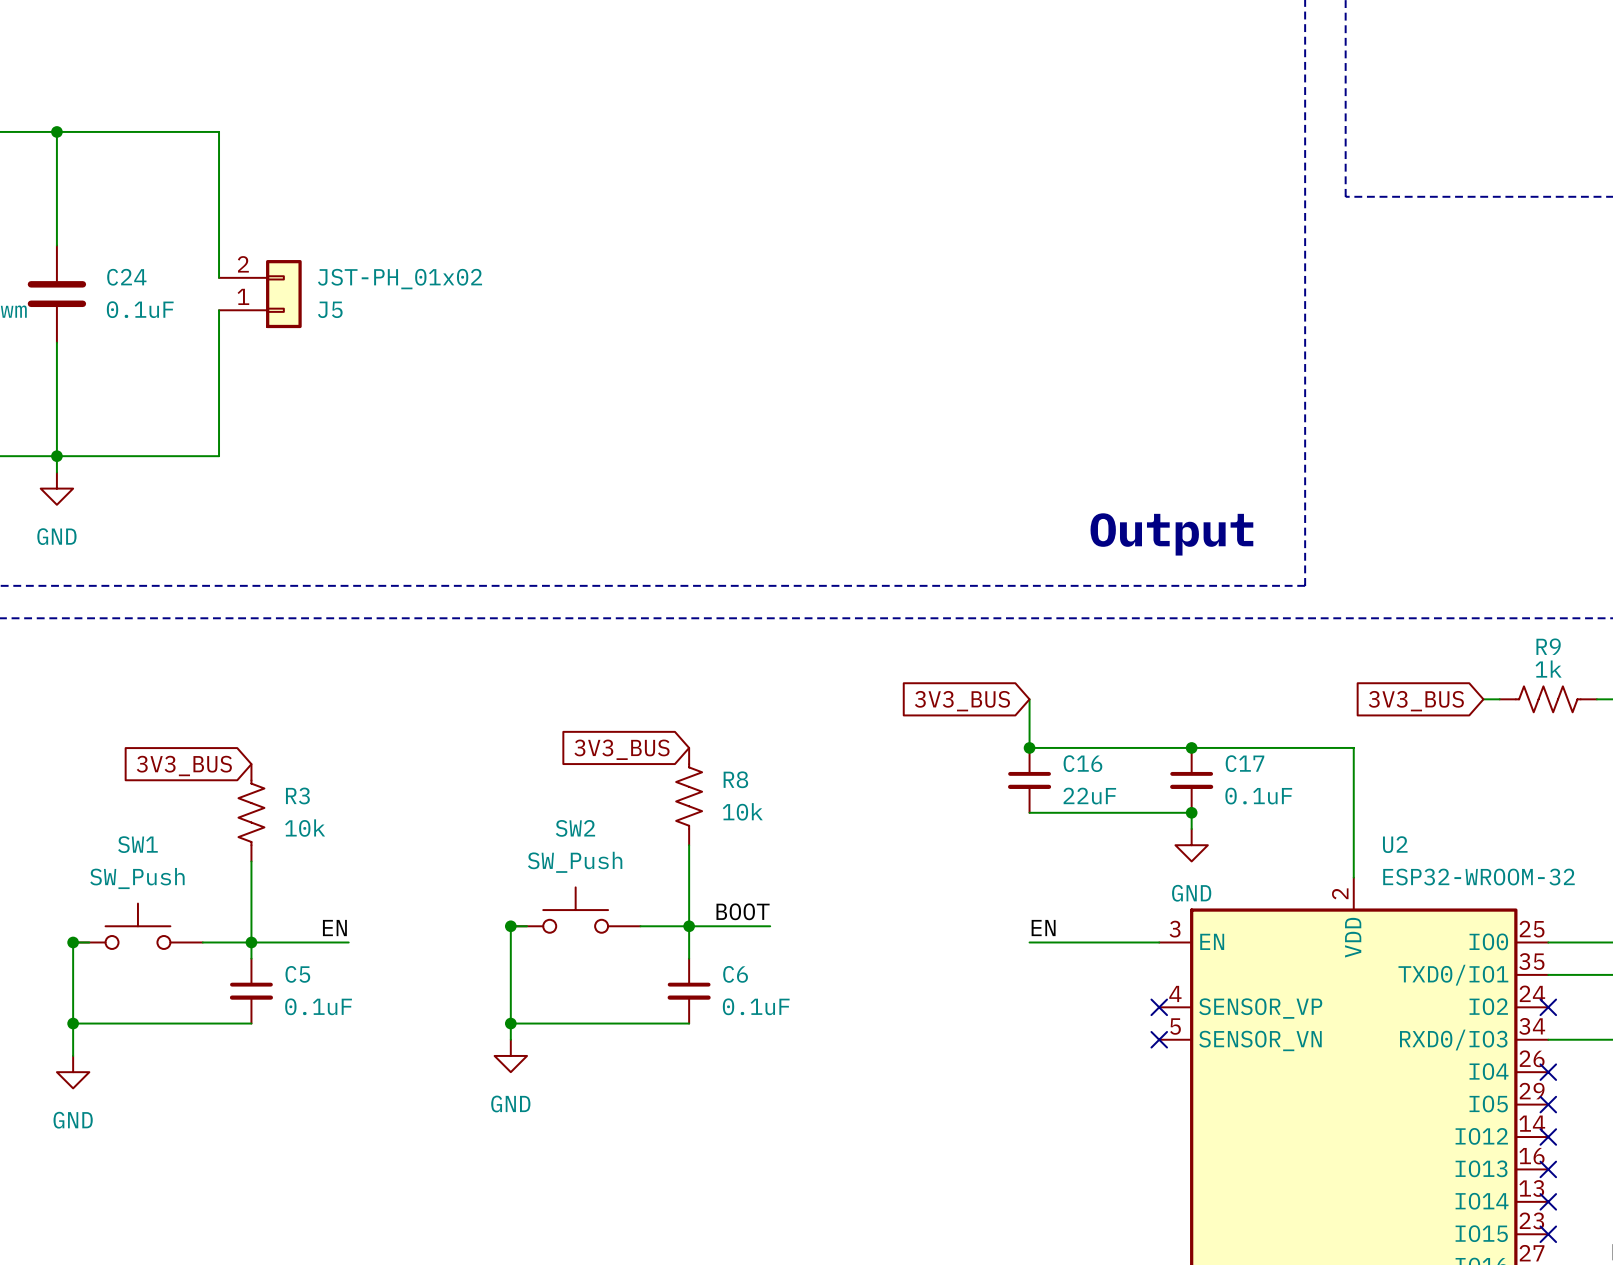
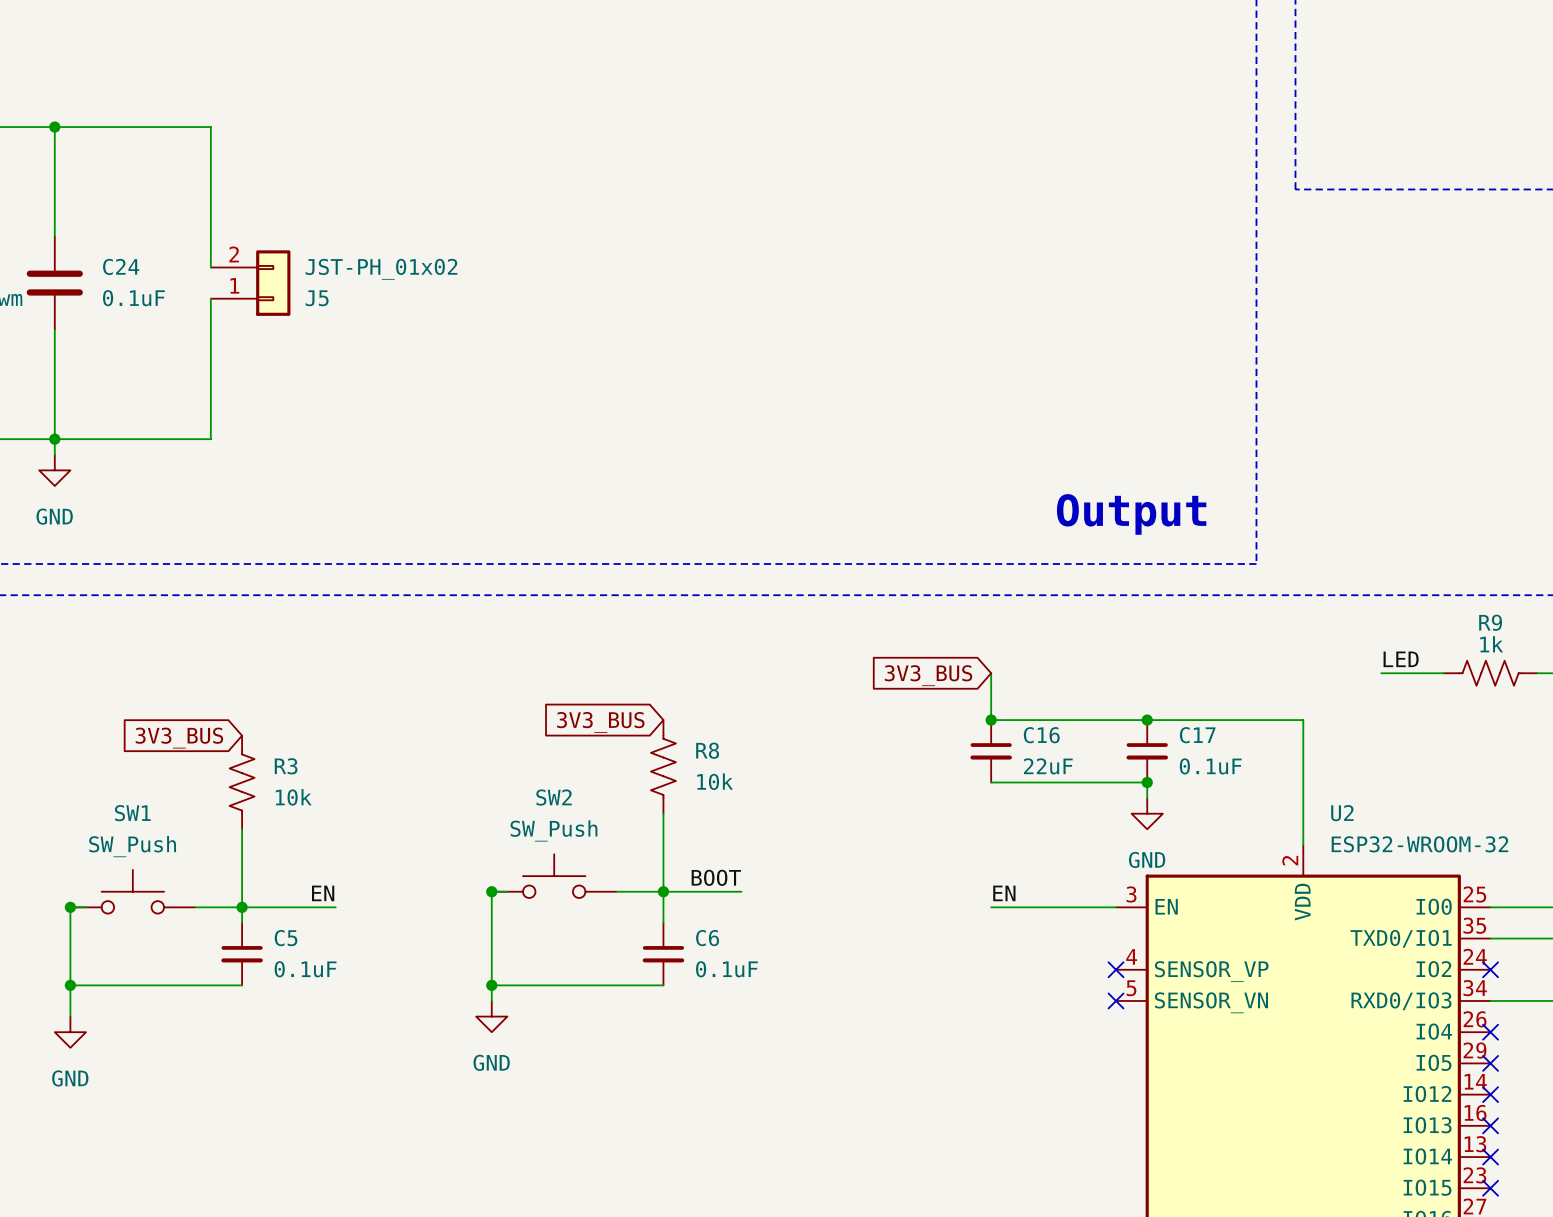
label: none -> LED (1401, 659)
wire: none -> (1381, 673) (1428, 673)
global label: 3V3_BUS (1416, 701) -> none

